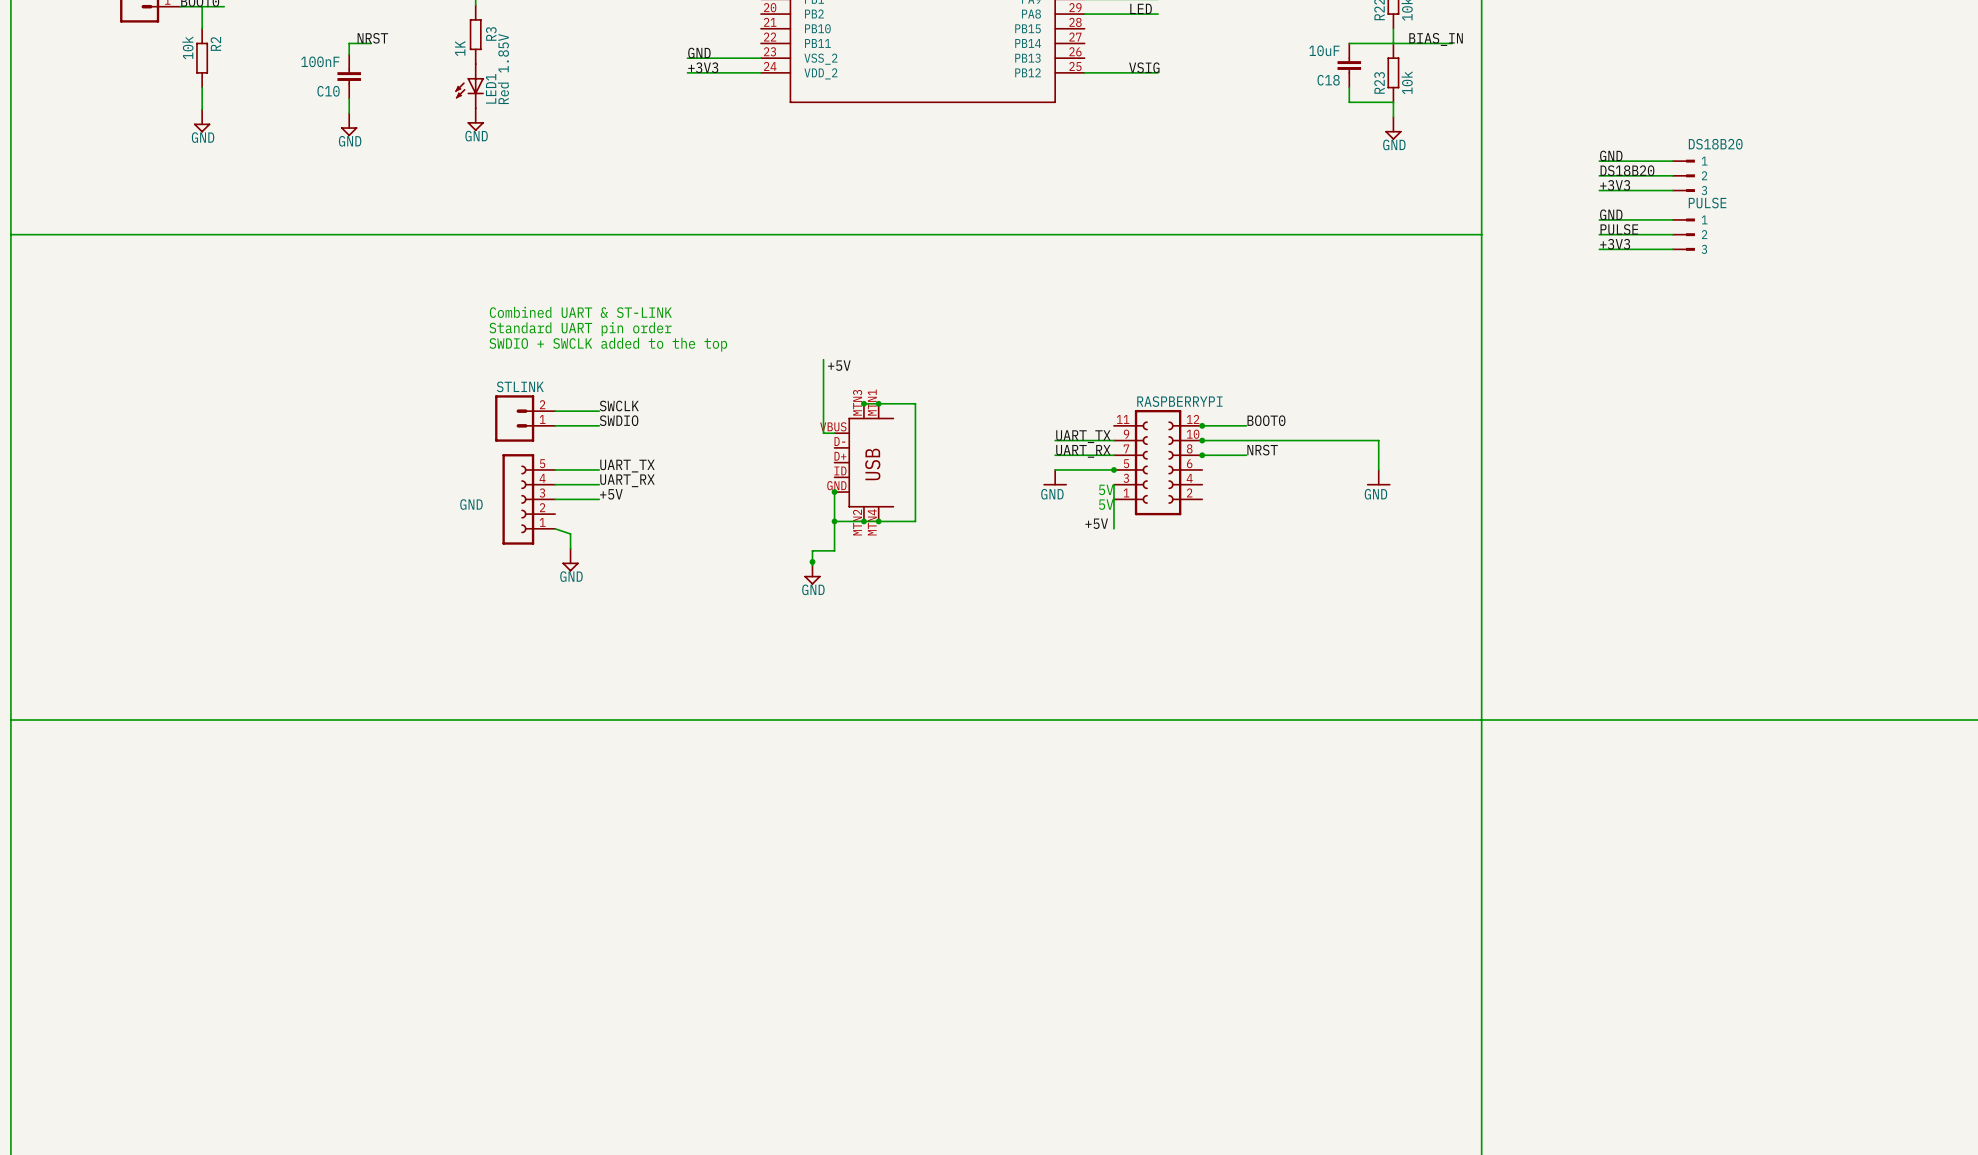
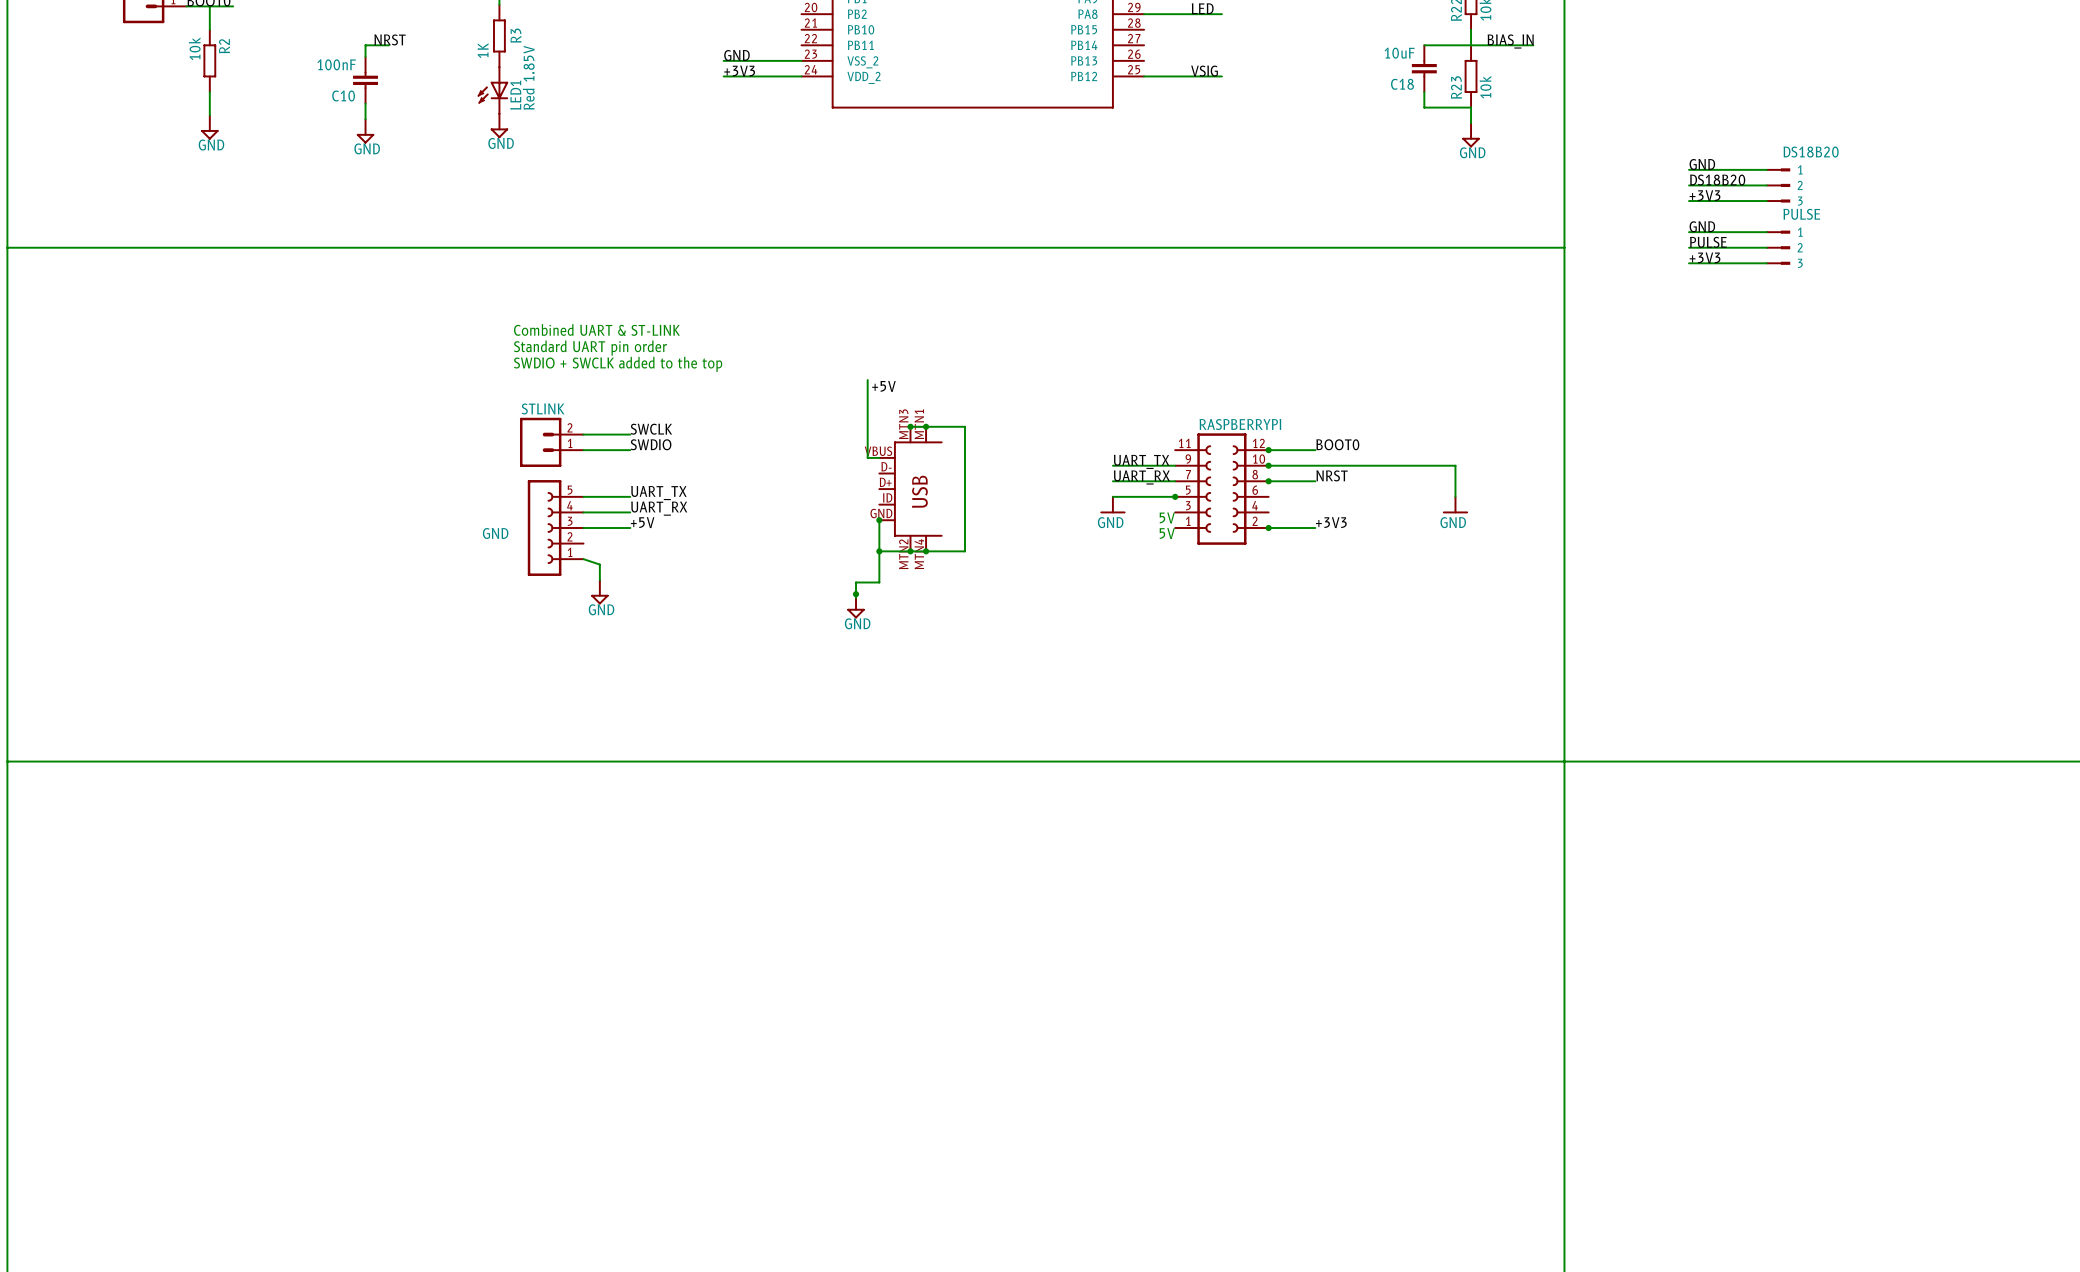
wire: (1113, 484) (1113, 528) -> none
label: none -> +3V3 (1331, 522)
wire: none -> (1268, 528) (1315, 528)
junction: none -> (1268, 528)
label: +5V (1096, 523) -> none

